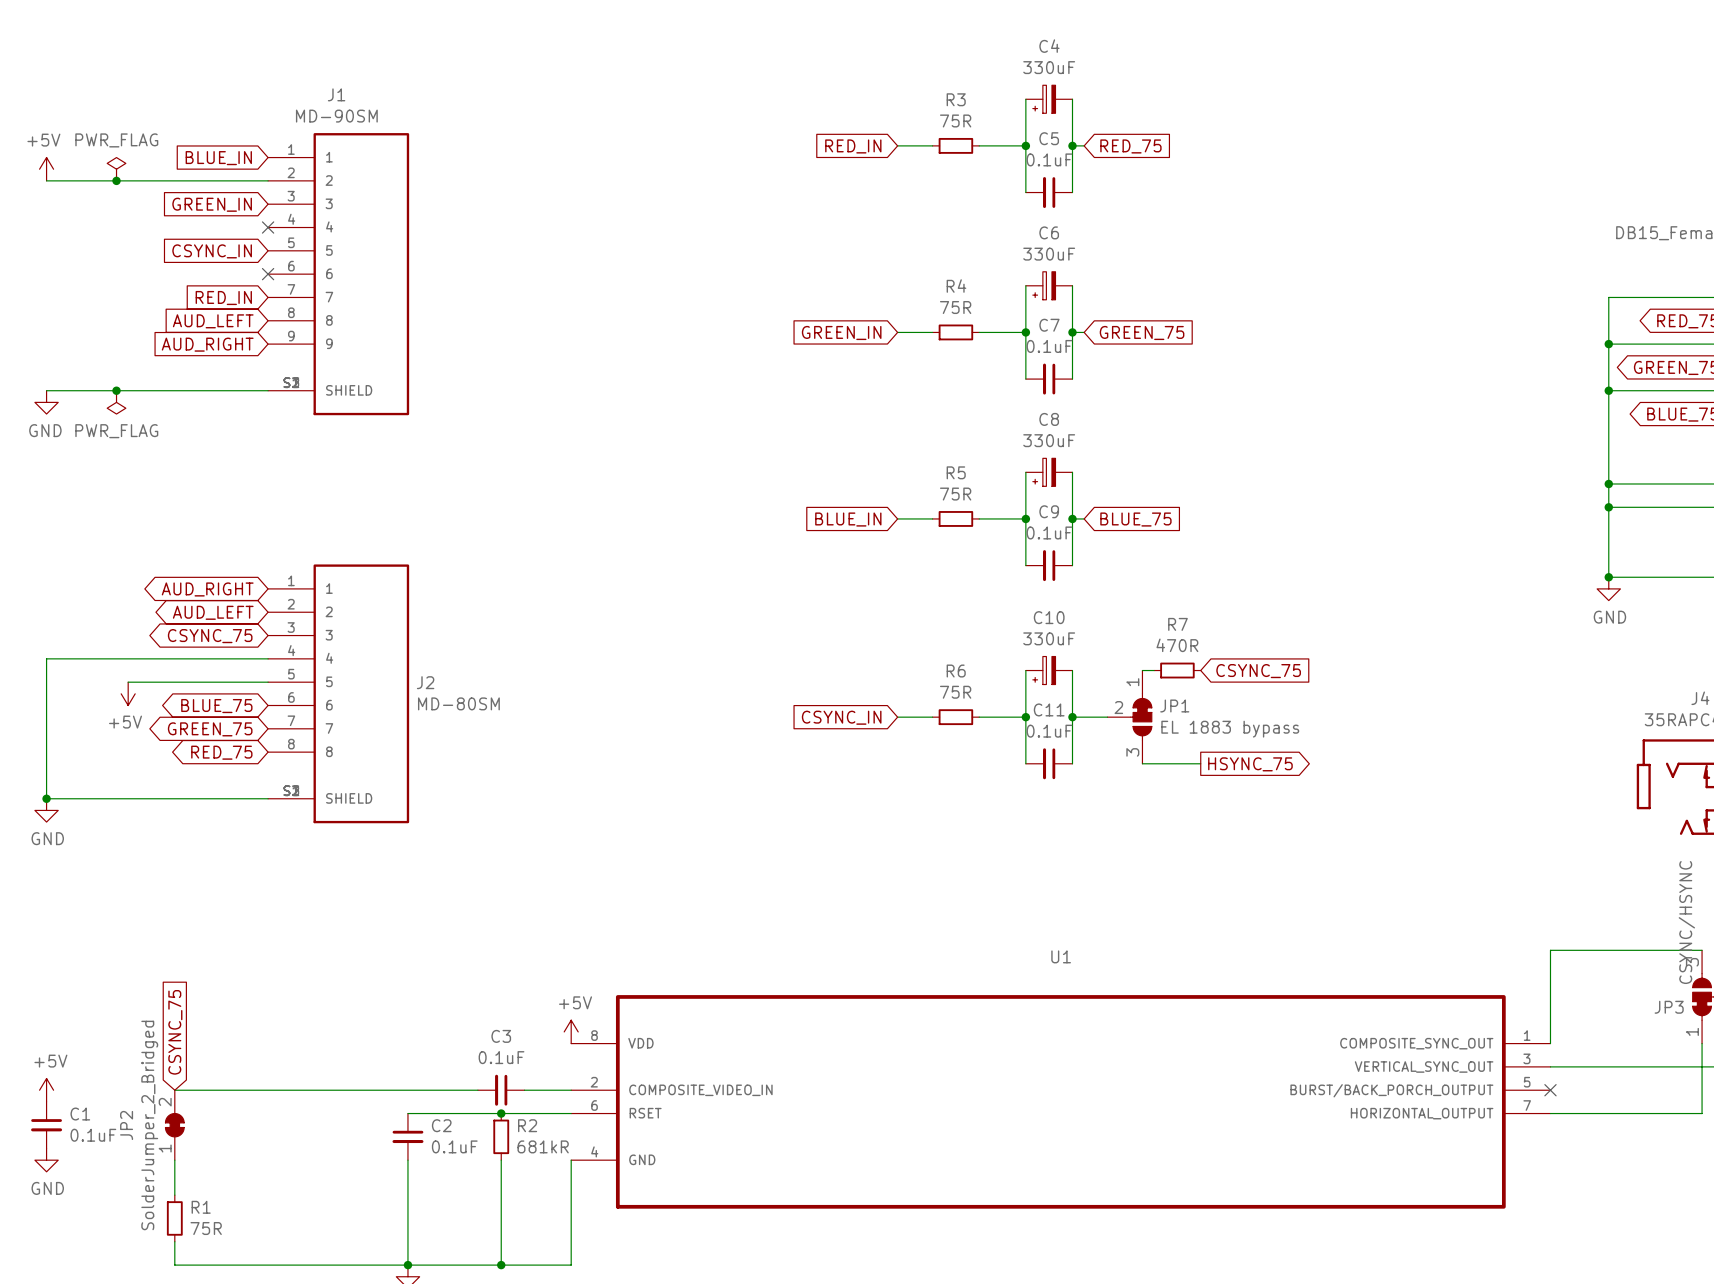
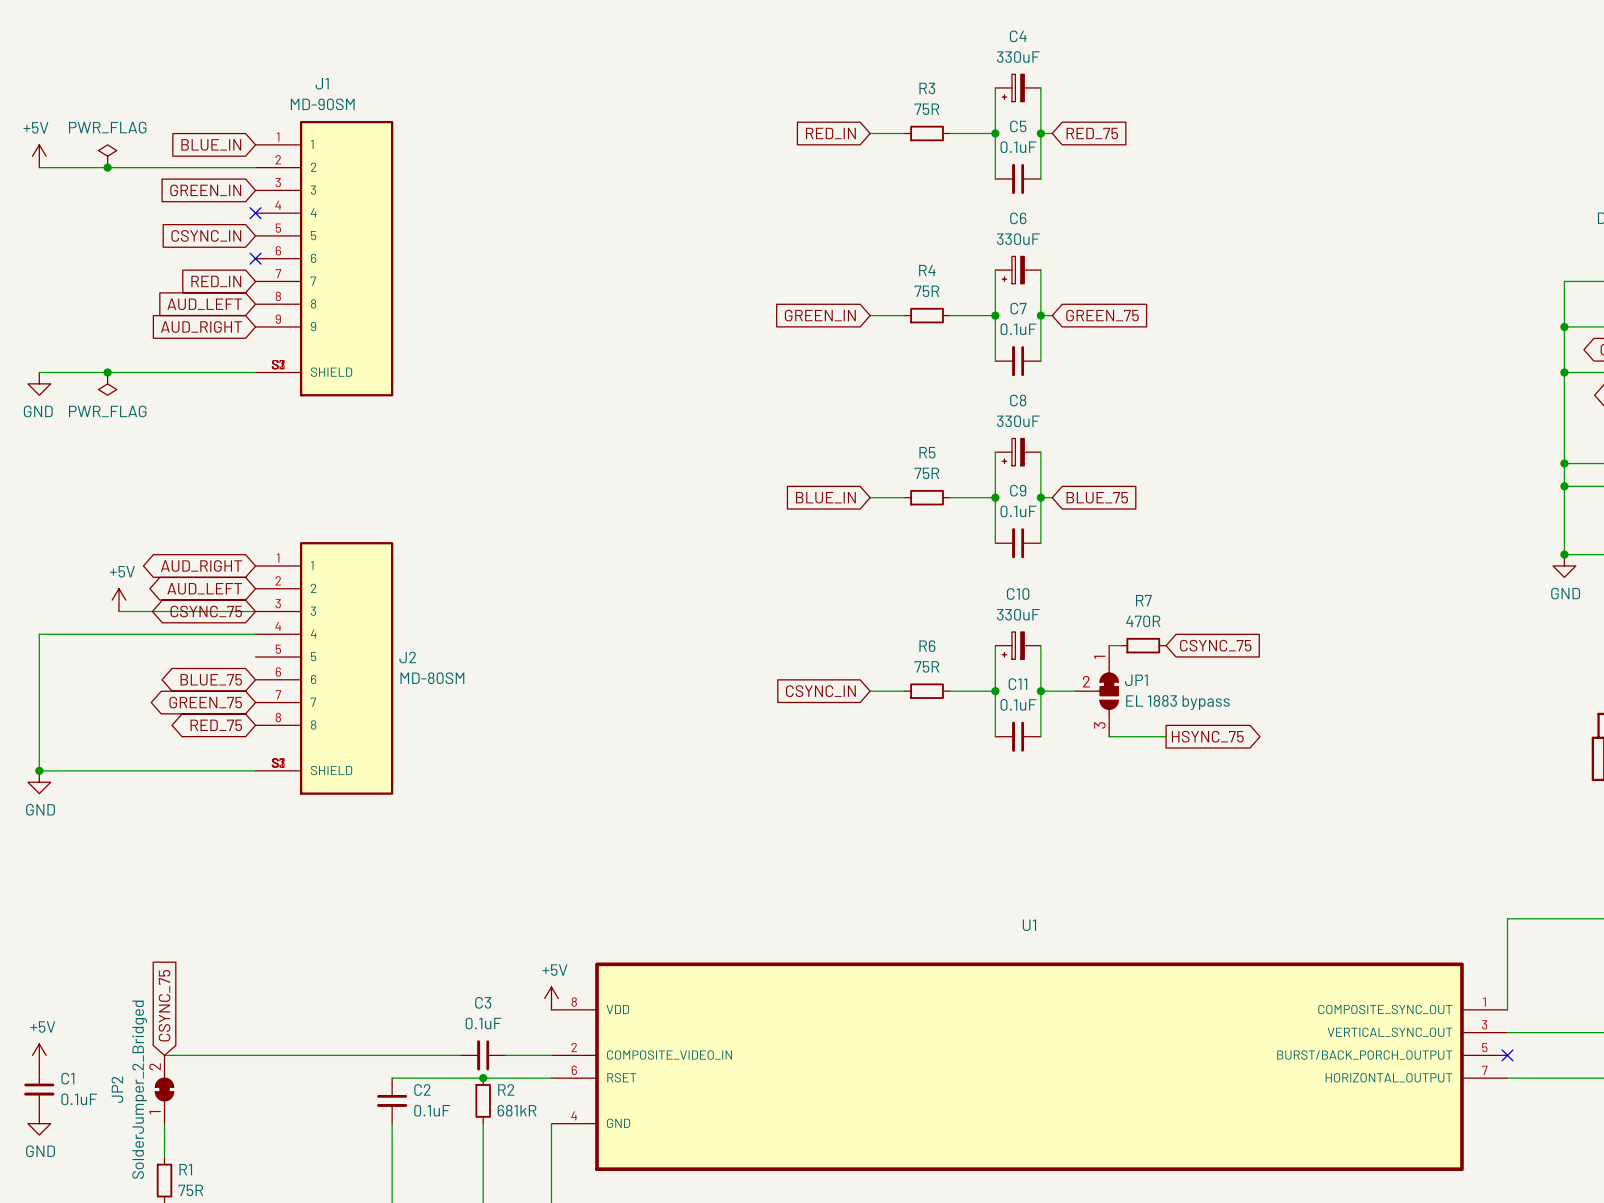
wire: (128, 682) (268, 682) -> (118, 611) (255, 611)
power symbol rotation: 0° (128, 693) -> 180° (118, 600)
power symbol position: +5V (128, 693) -> +5V (118, 600)

